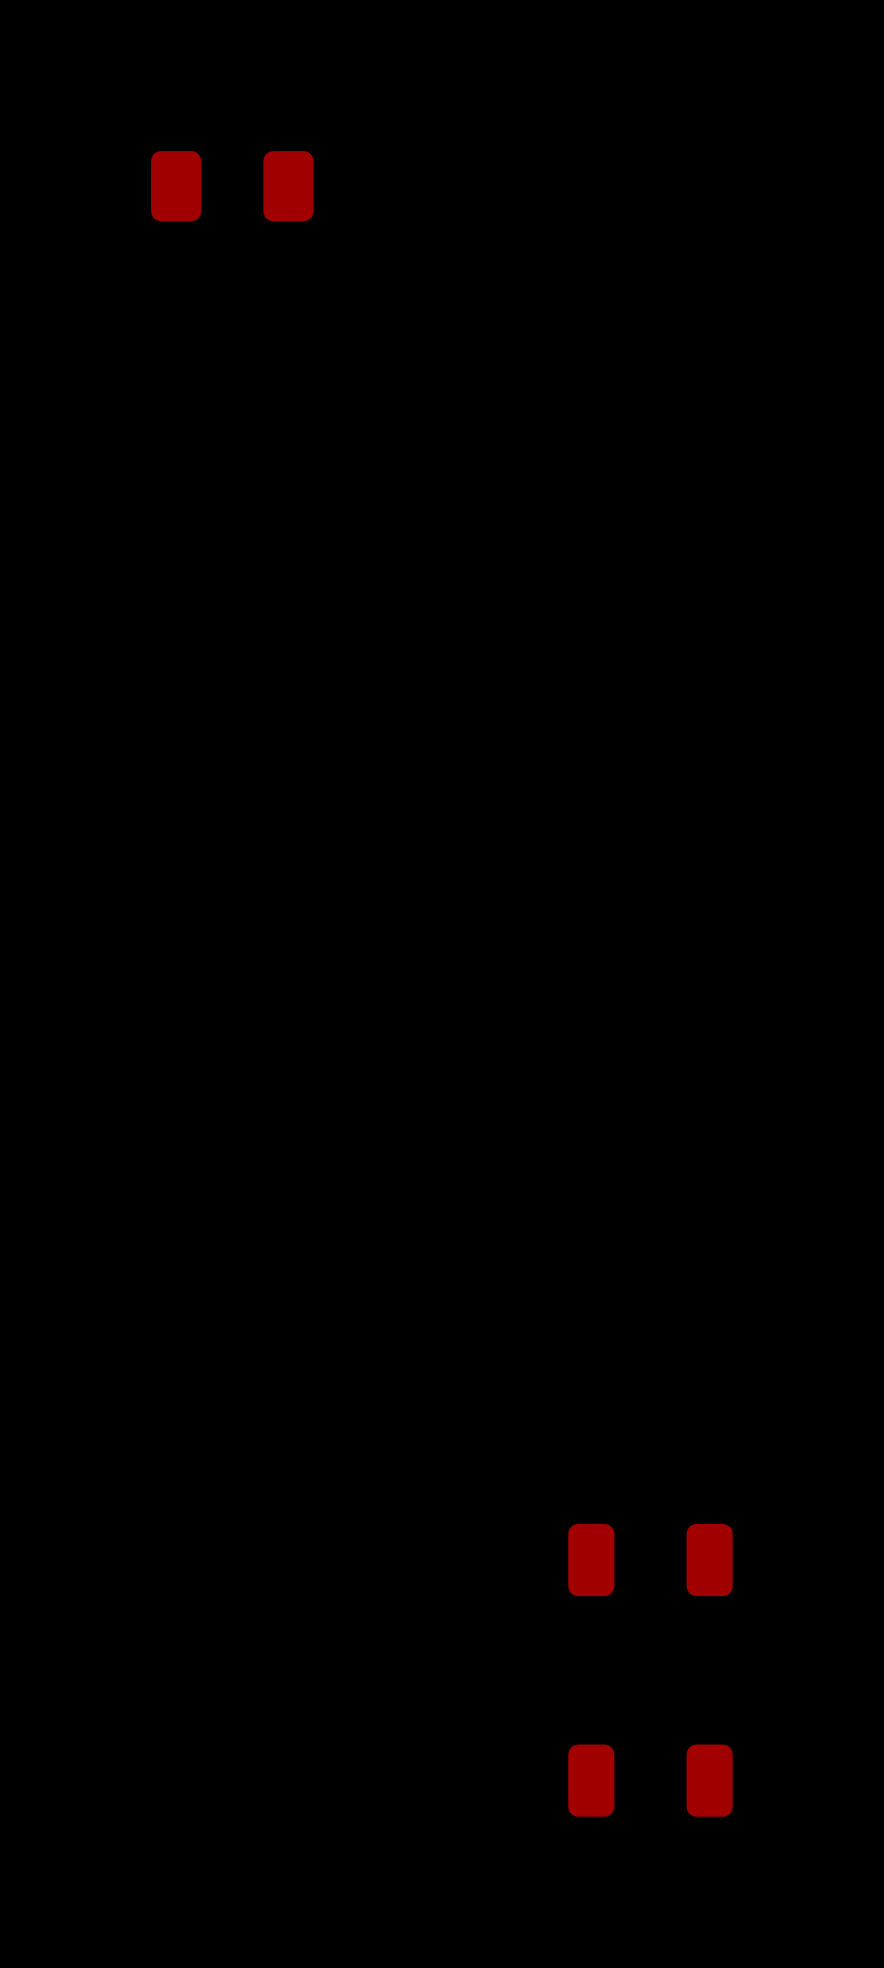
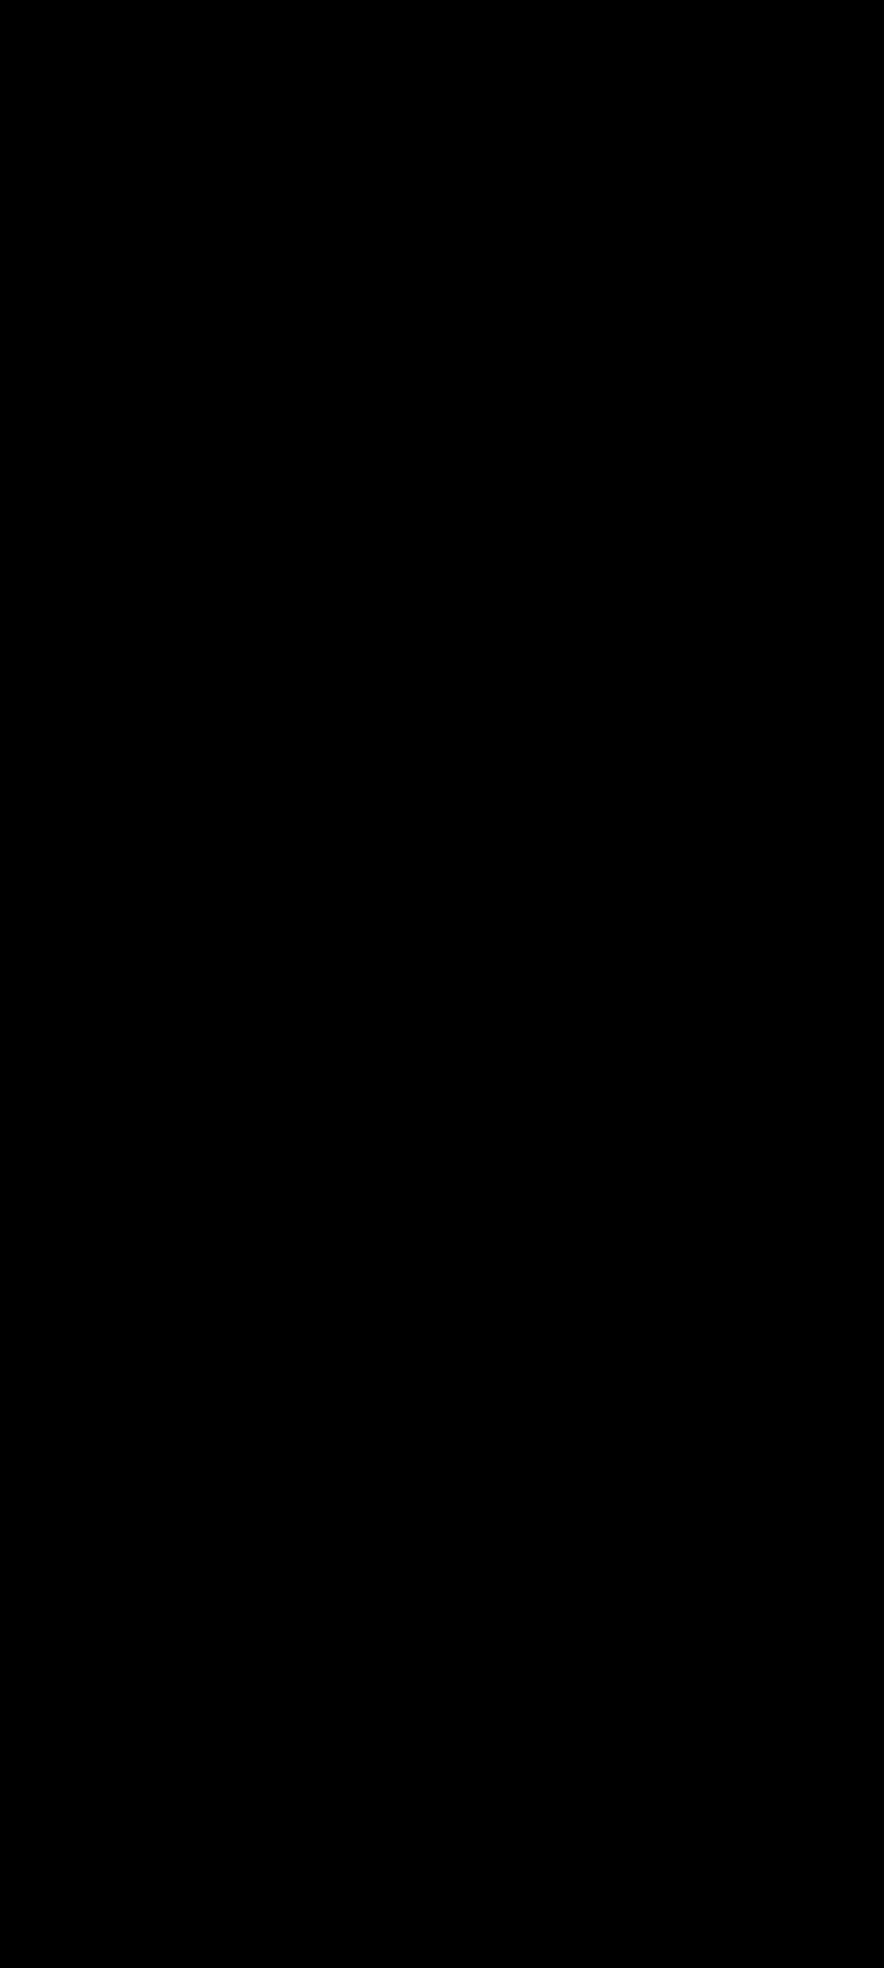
part: (232, 186) -> none
part: (650, 1560) -> none
part: (650, 1780) -> none

